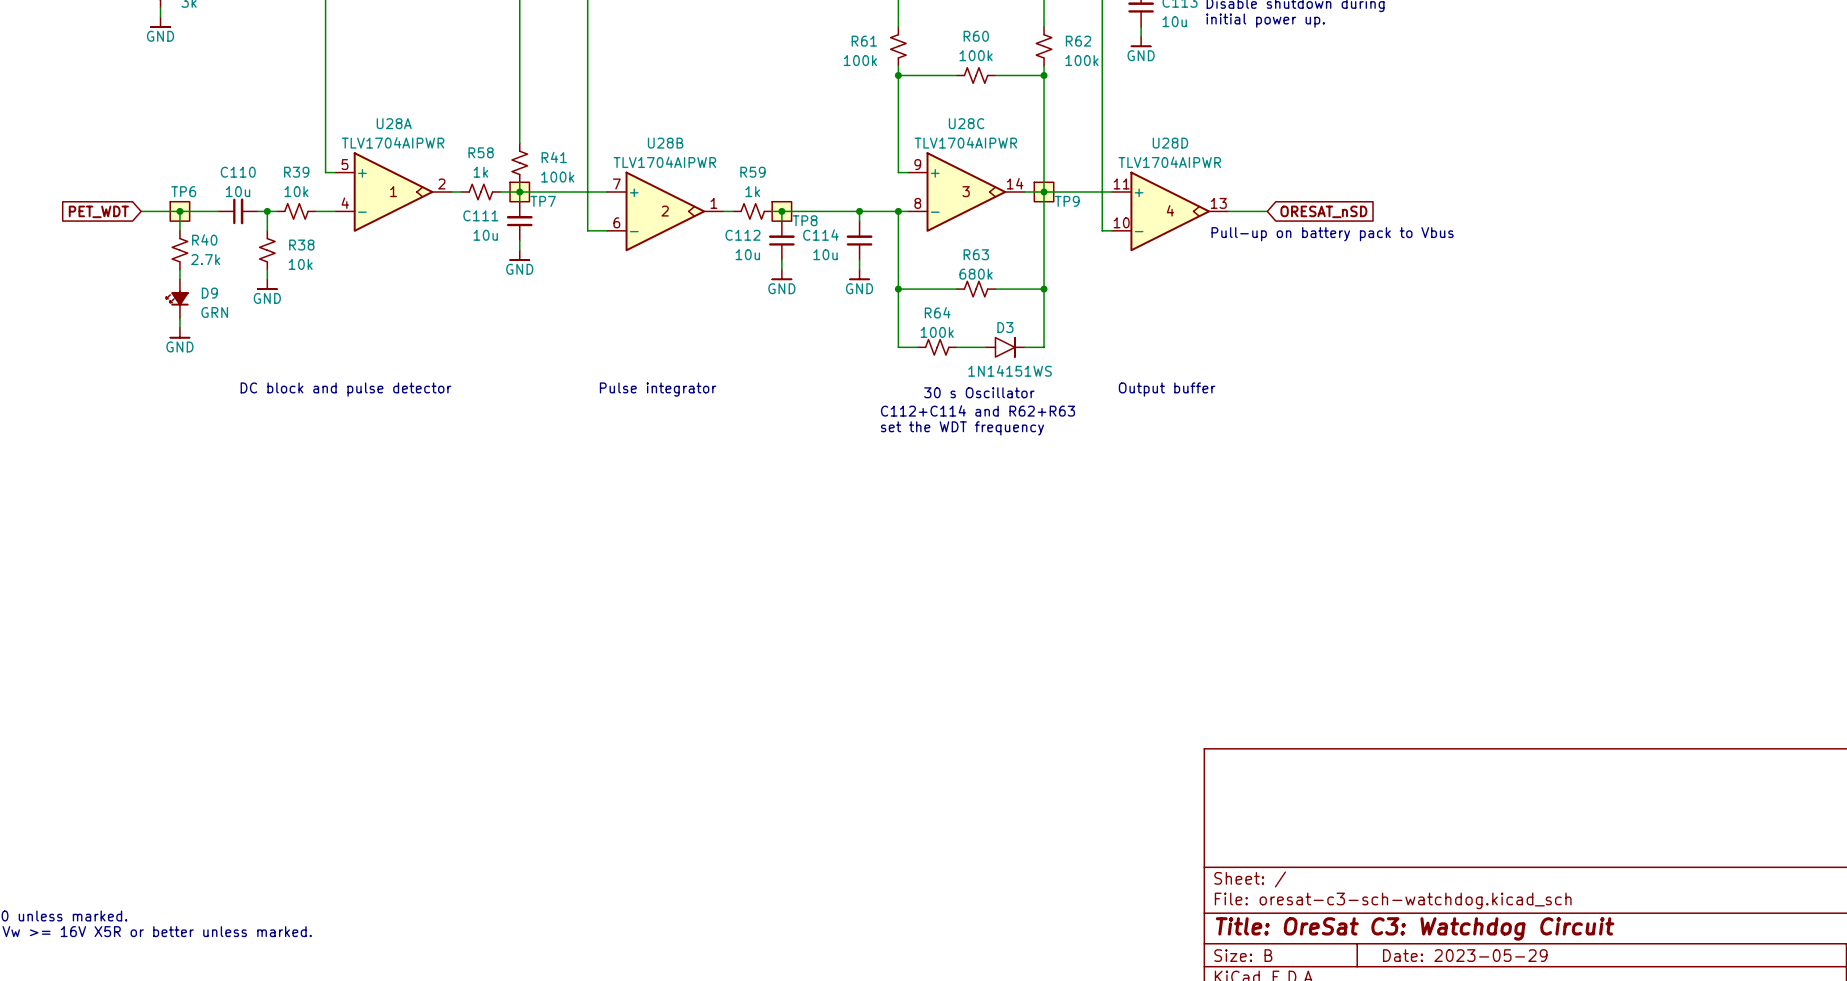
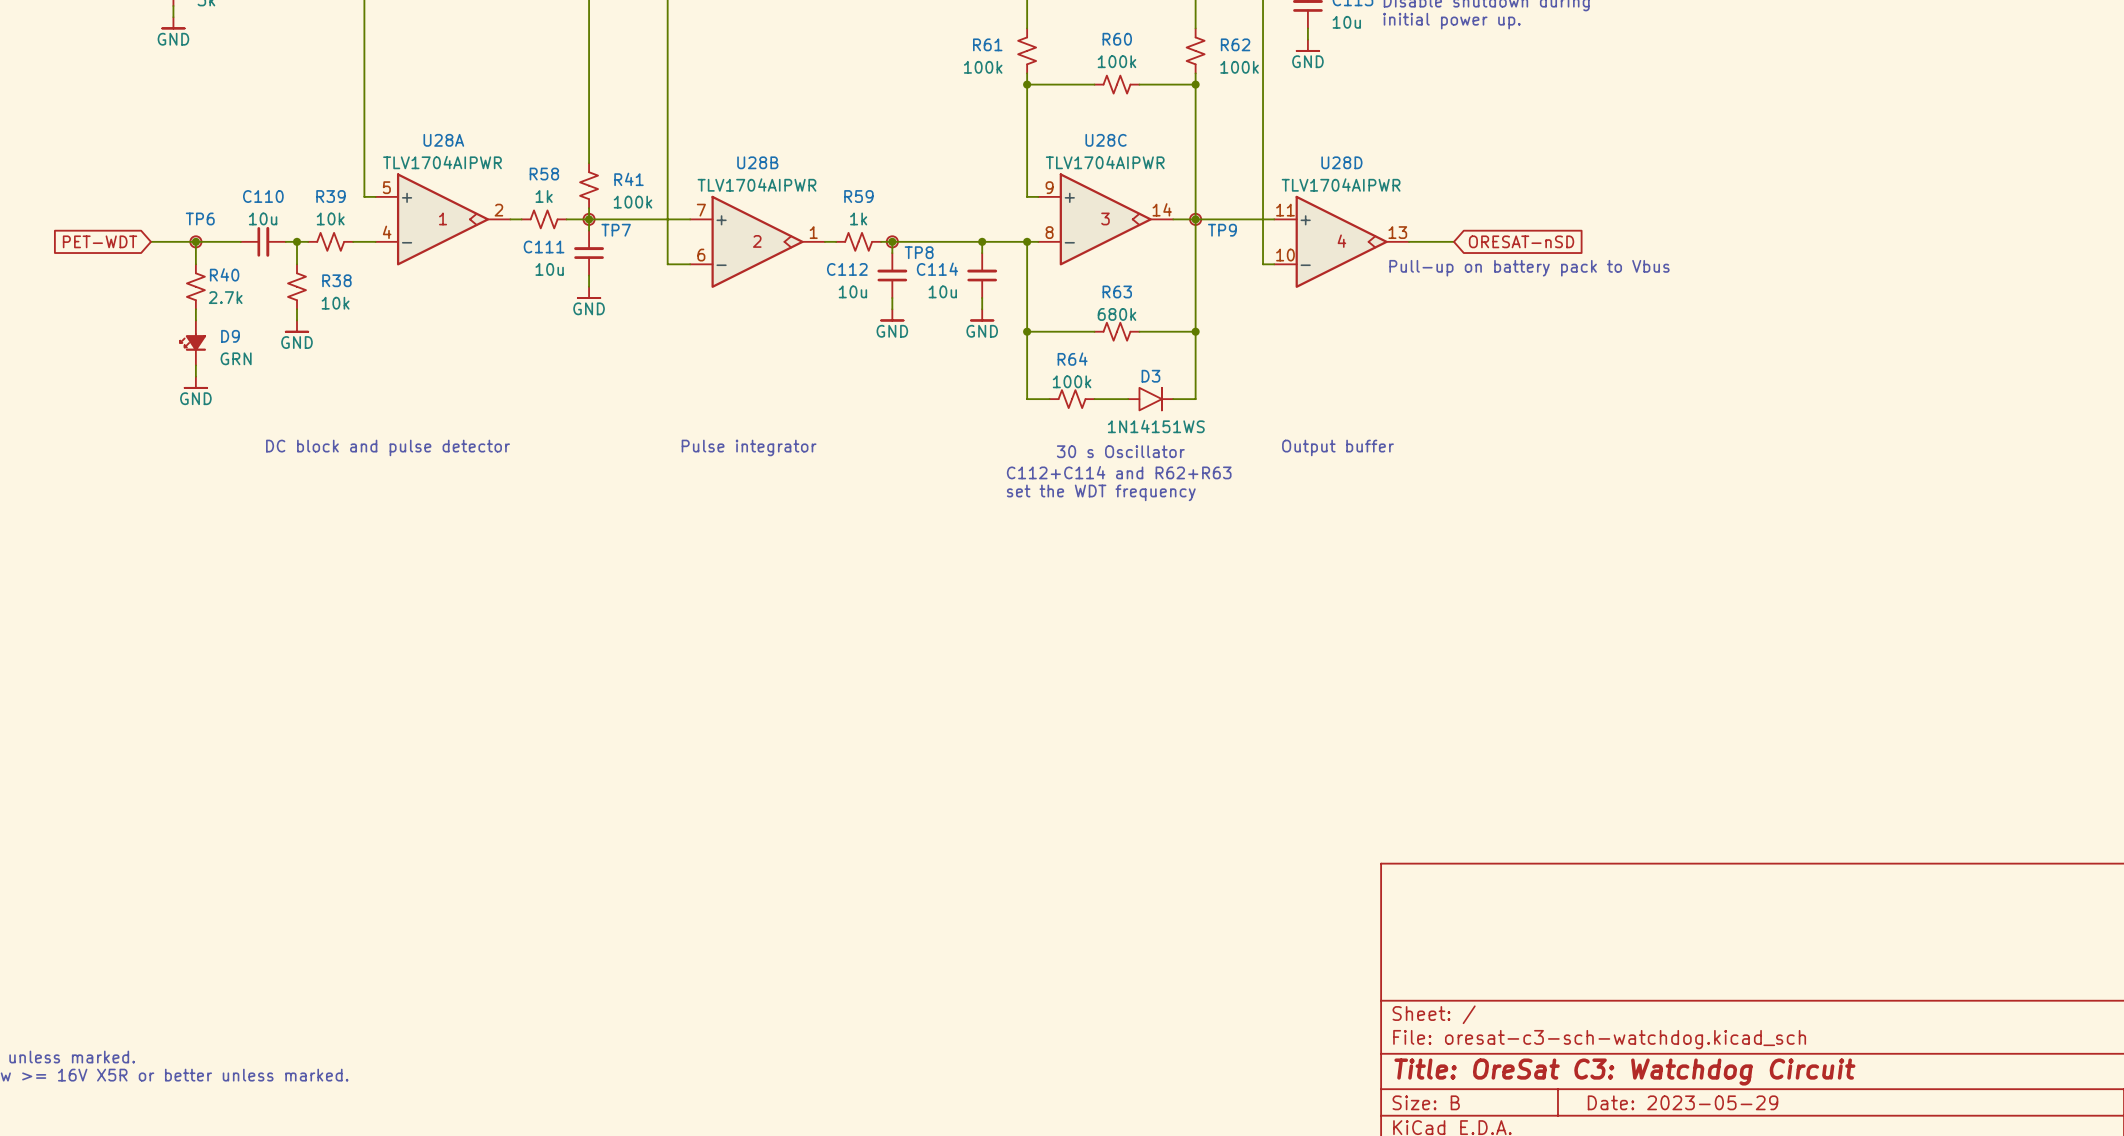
TP7 symbol: [510, 182, 530, 202] -> [583, 213, 595, 226]
TP9 symbol: [1034, 182, 1054, 202] -> [1190, 213, 1202, 226]
TP6 symbol: [170, 201, 190, 222] -> [190, 236, 202, 248]
TP8 symbol: [772, 201, 792, 222] -> [886, 236, 898, 248]
global label: PET_WDT (98, 211) -> PET-WDT (100, 241)
global label: ORESAT_nSD (1323, 211) -> ORESAT-nSD (1521, 241)

